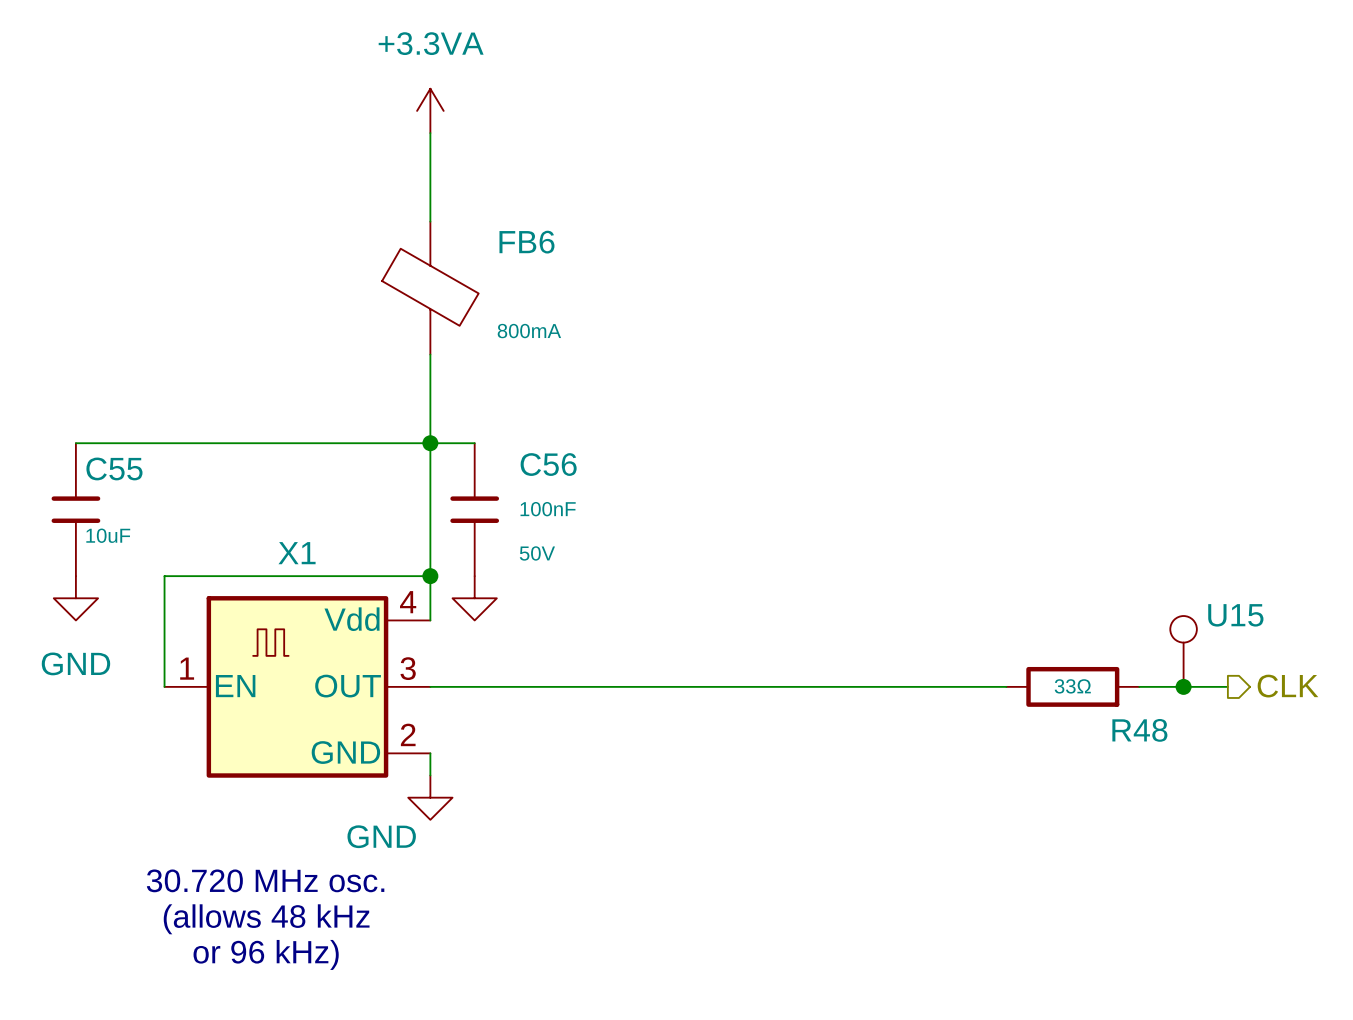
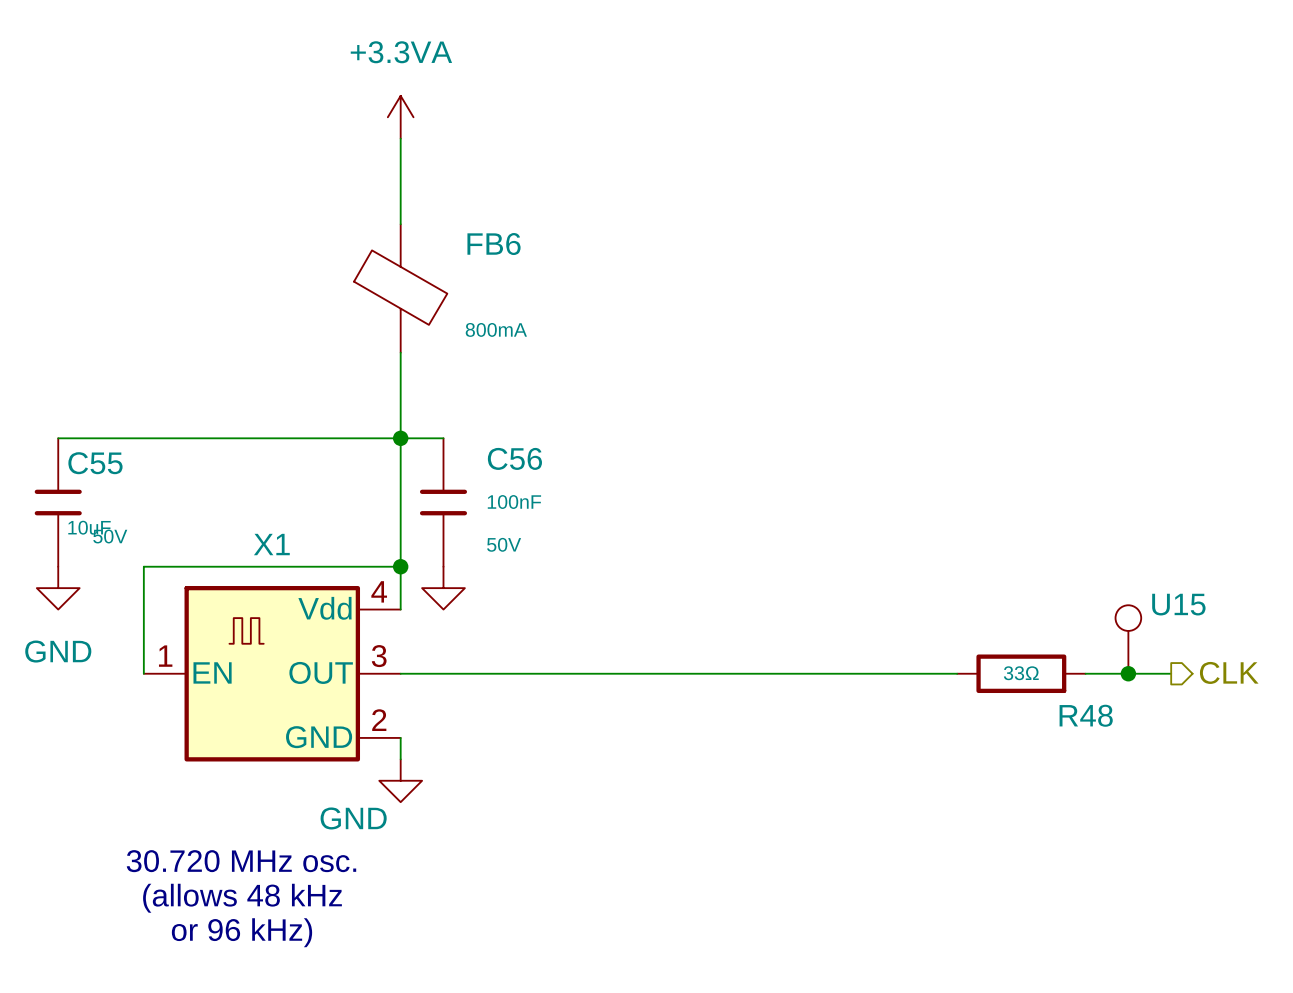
C55 text: none -> 50V (110, 536)

